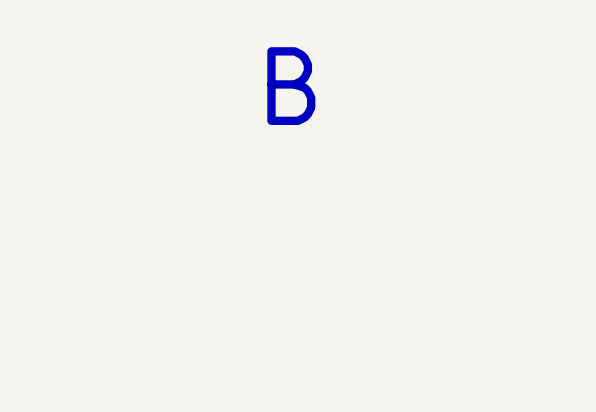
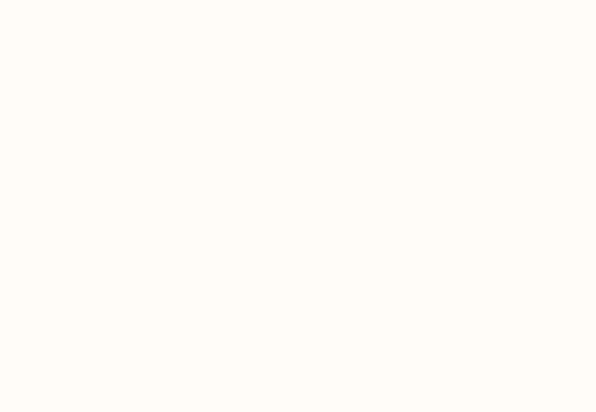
text: B (291, 86) -> none

